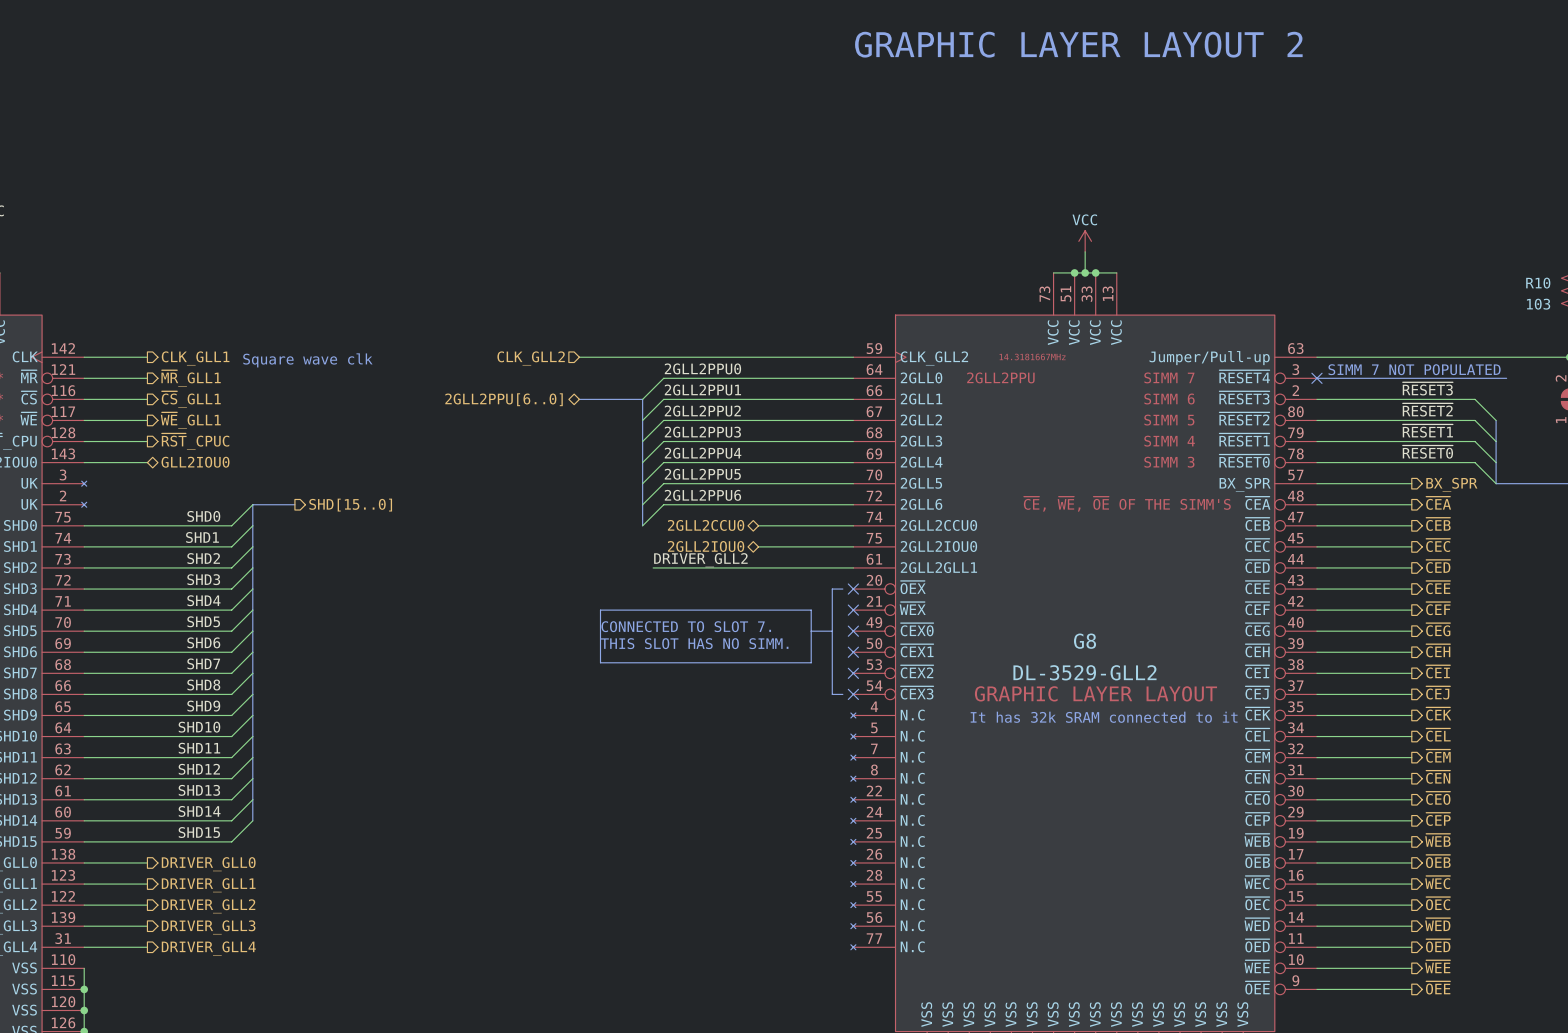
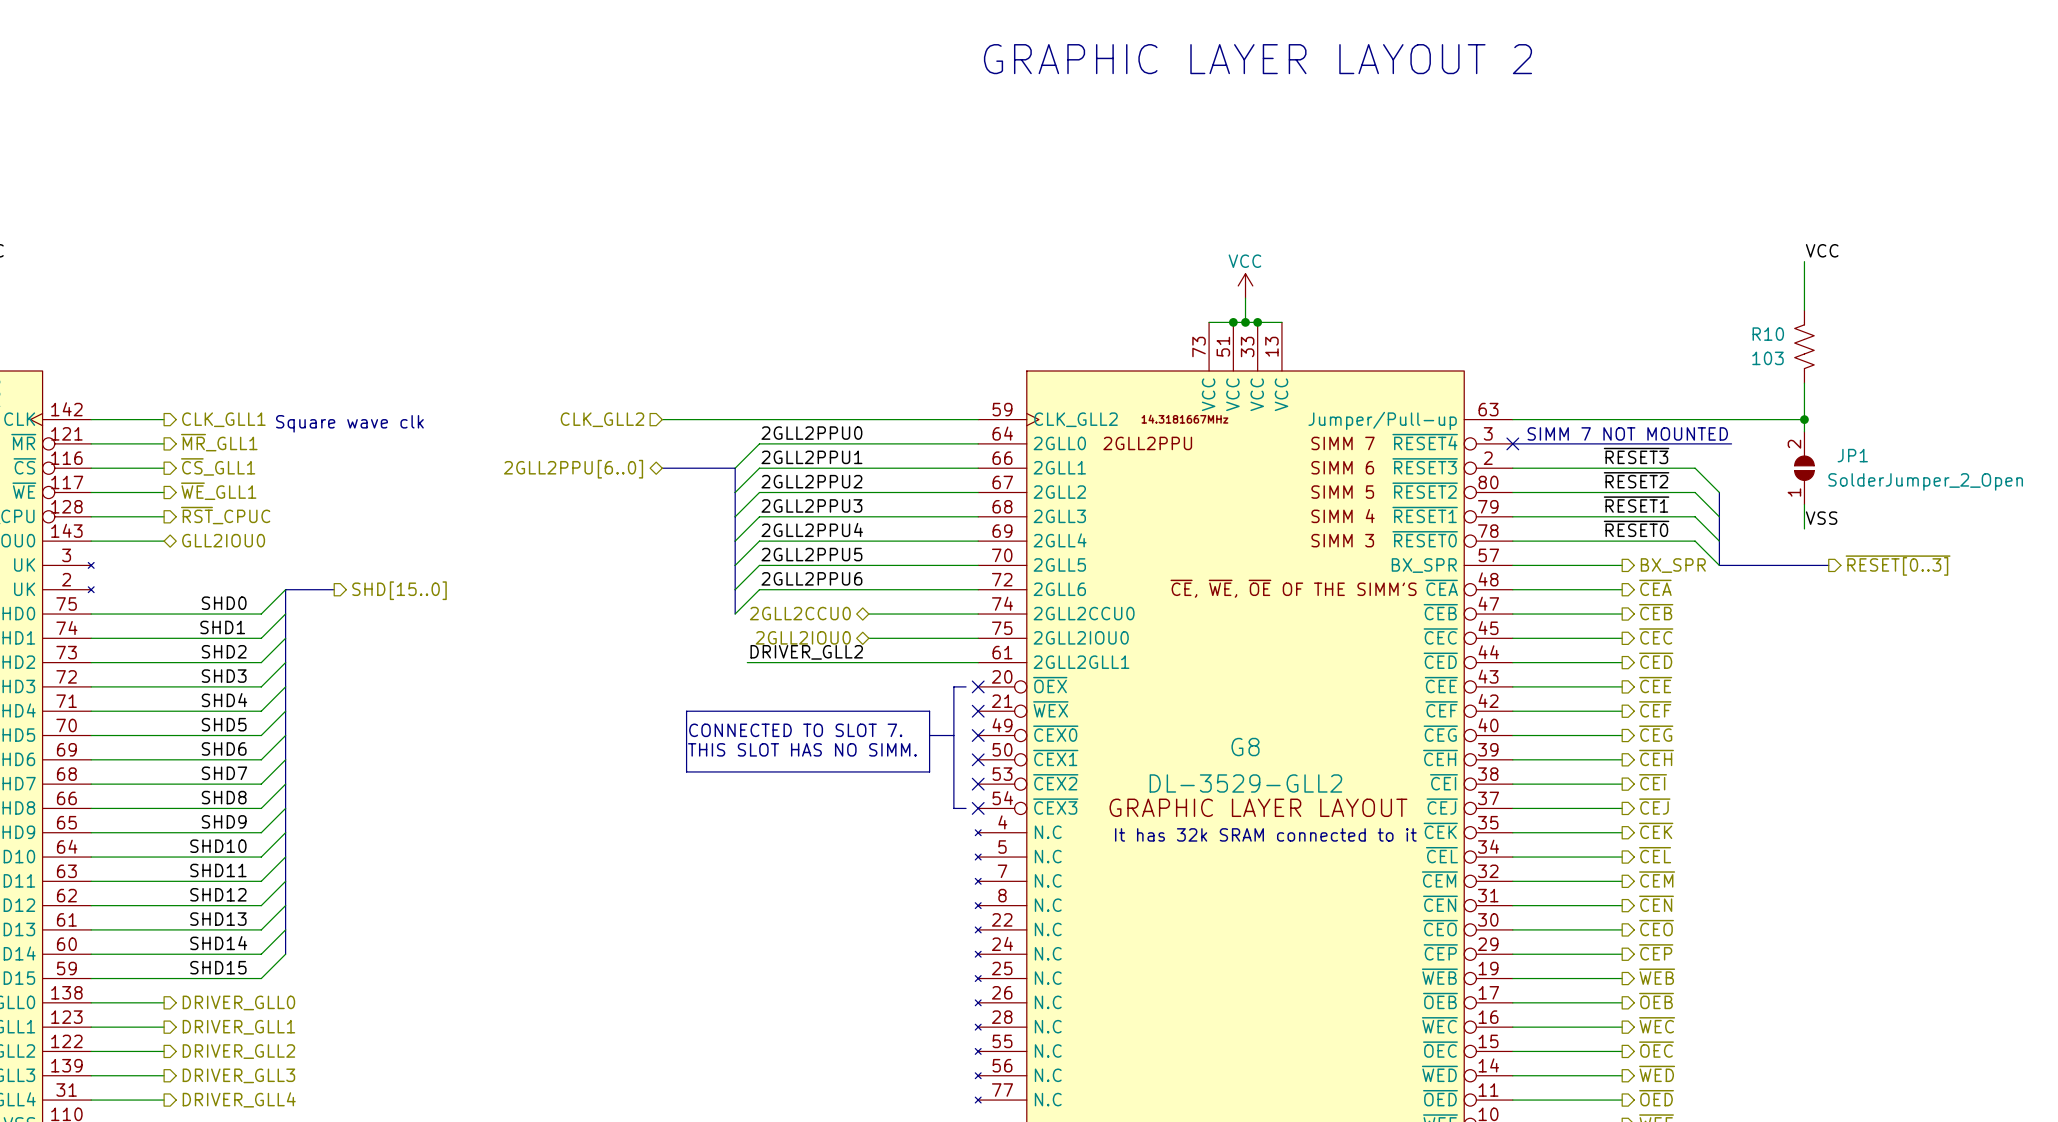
text: SIMM 7 NOT POPULATED (1414, 369) -> SIMM 7 NOT MOUNTED (1627, 433)

